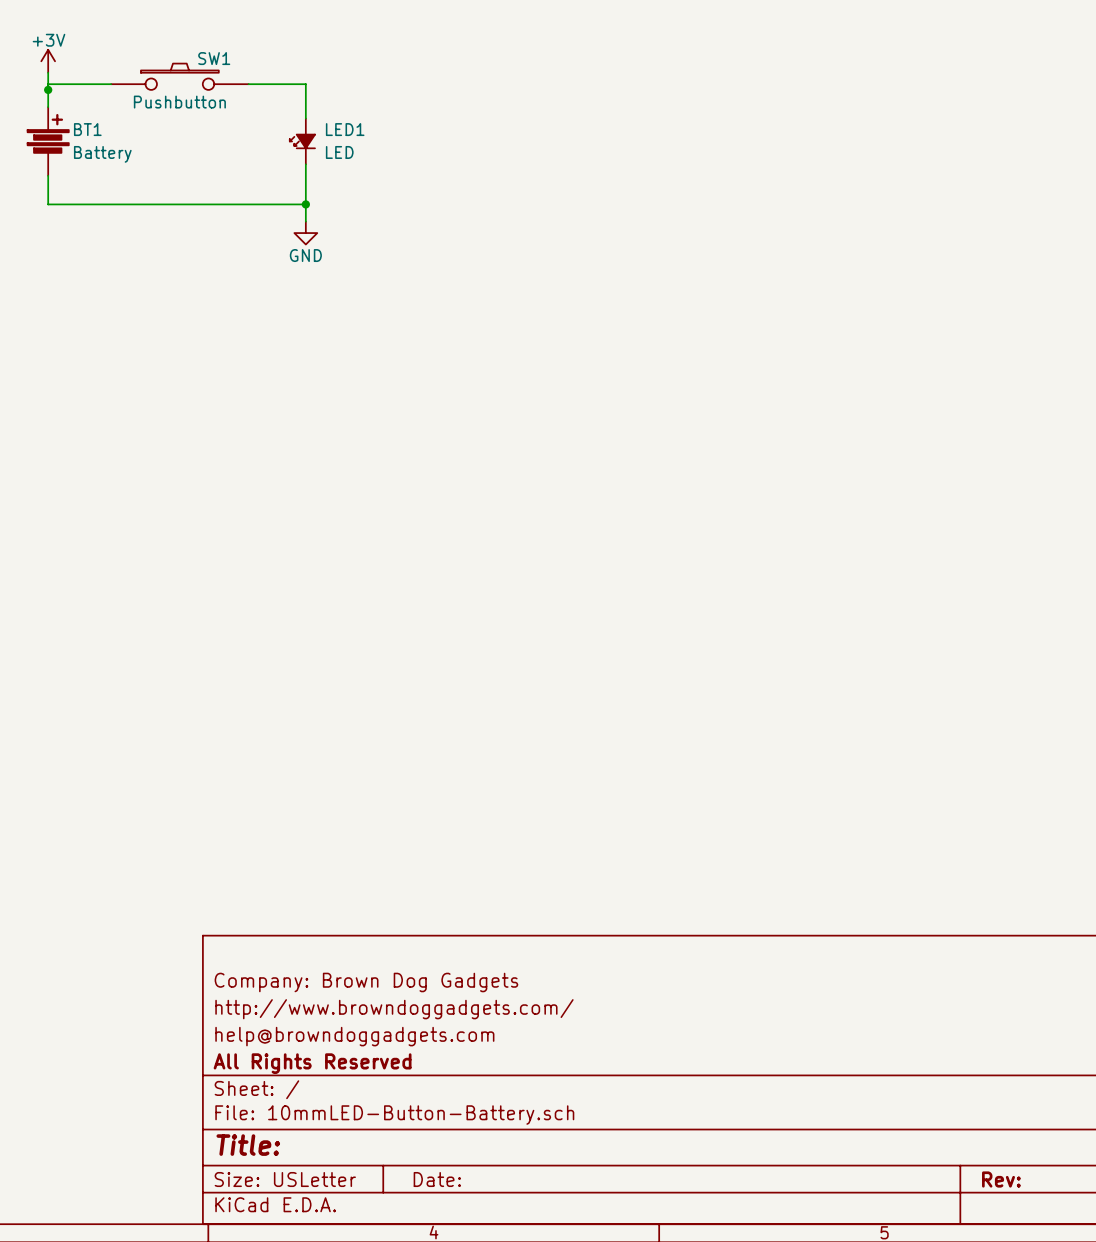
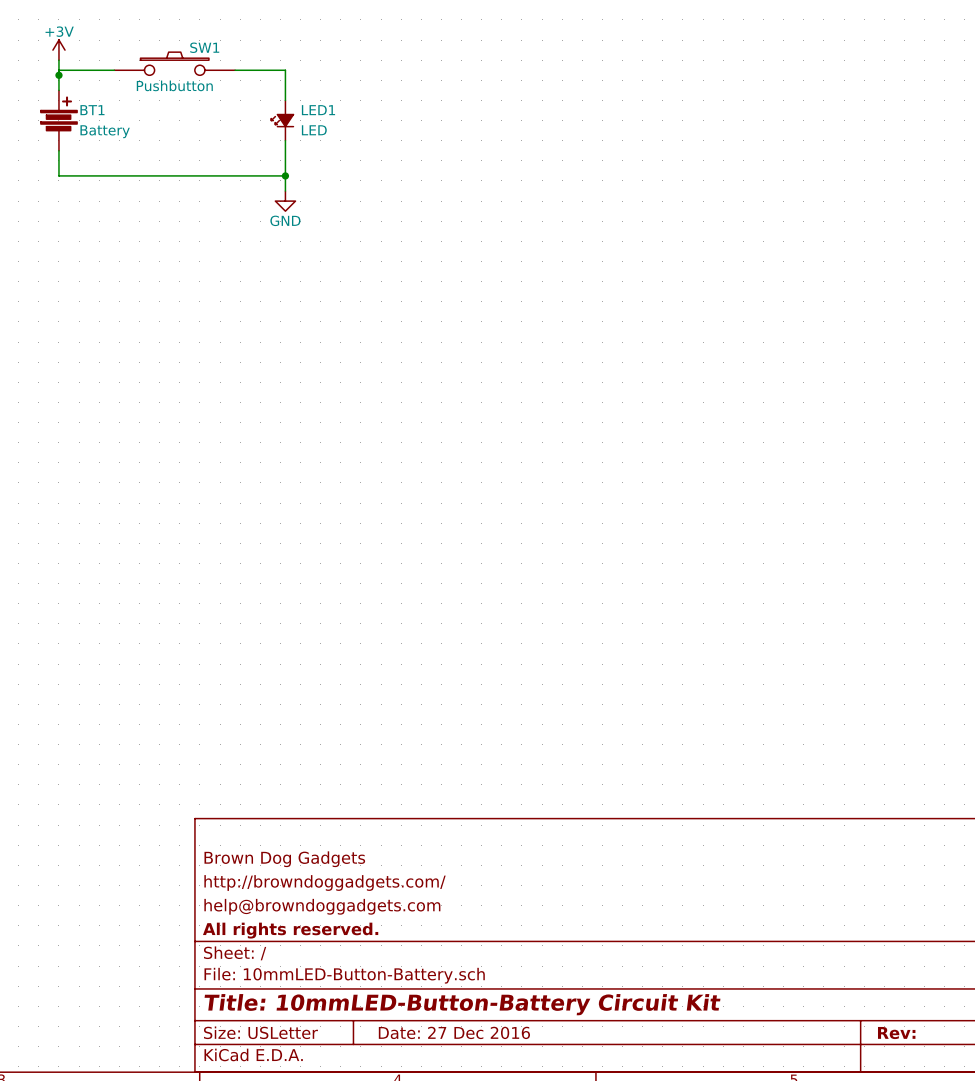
title block: Company: Brown Dog Gadgets (366, 982) -> Brown Dog Gadgets (284, 859)
title block: http://www.browndoggadgets.com/ (394, 1009) -> http://browndoggadgets.com/ (325, 882)
title block: All Rights Reserved (312, 1063) -> All rights reserved. (290, 930)
title block: Title: (248, 1145) -> Title: 10mmLED-Button-Battery Circuit Kit (462, 1004)
title block: Date: (437, 1179) -> Date: 27 Dec 2016 (454, 1032)

